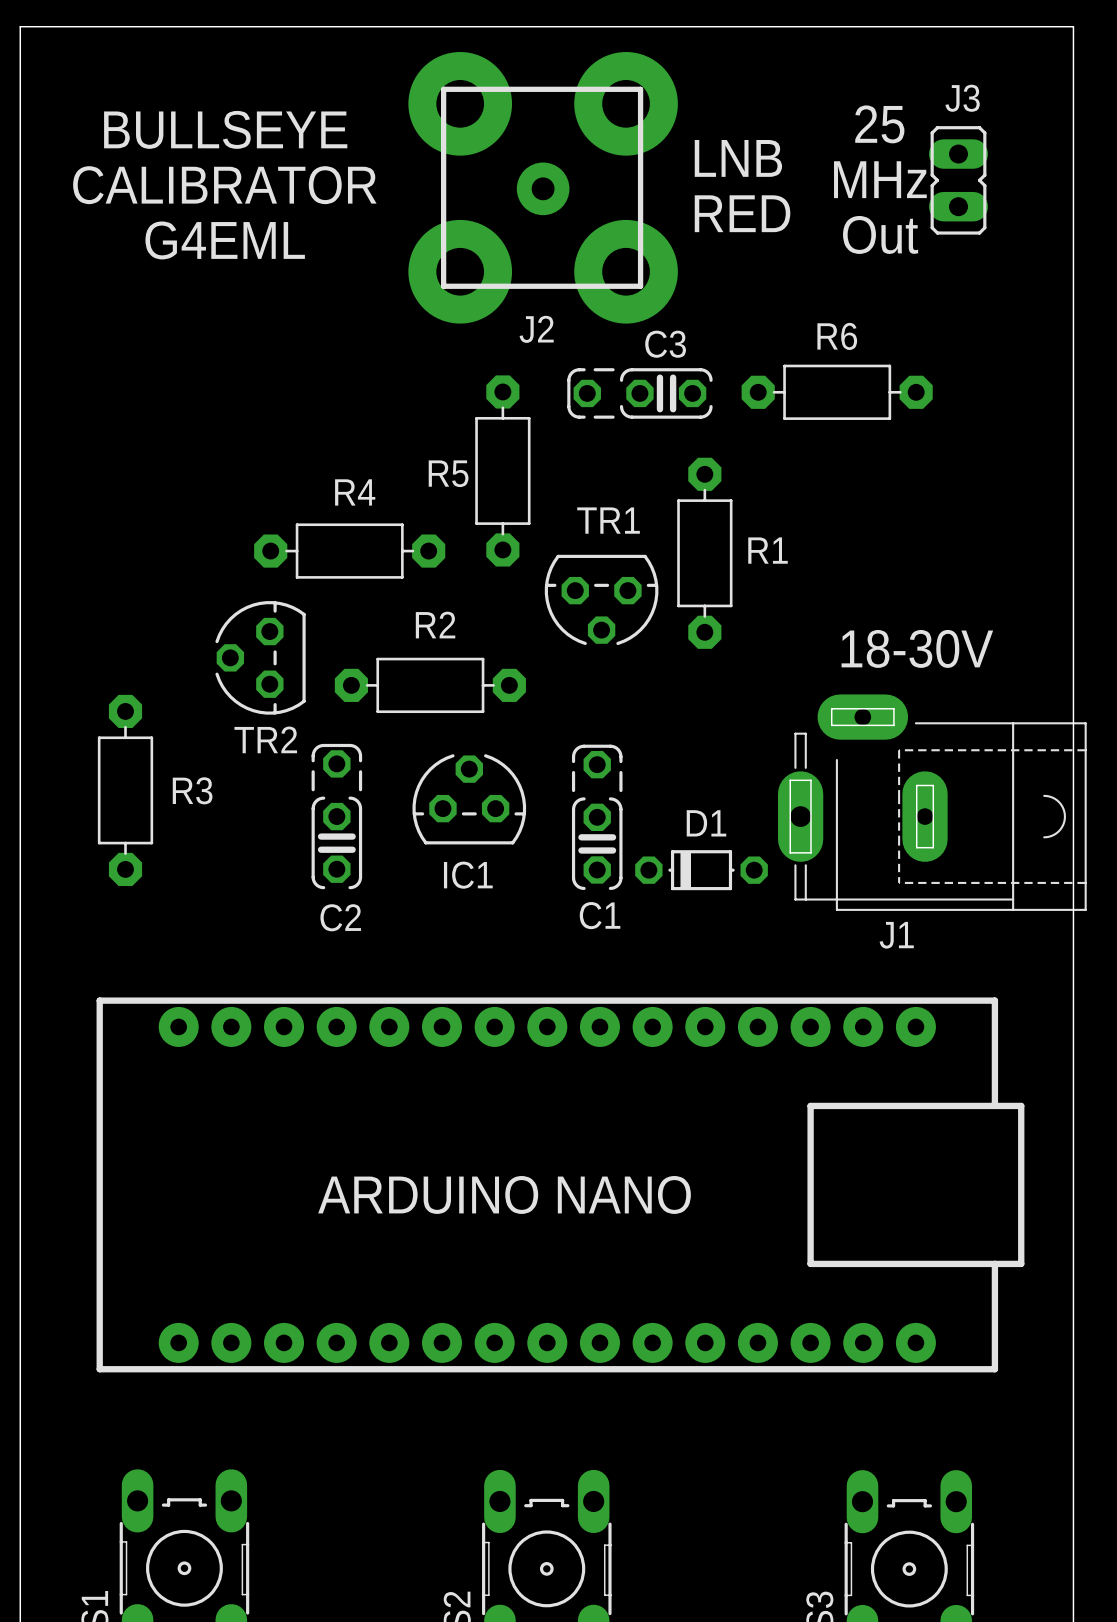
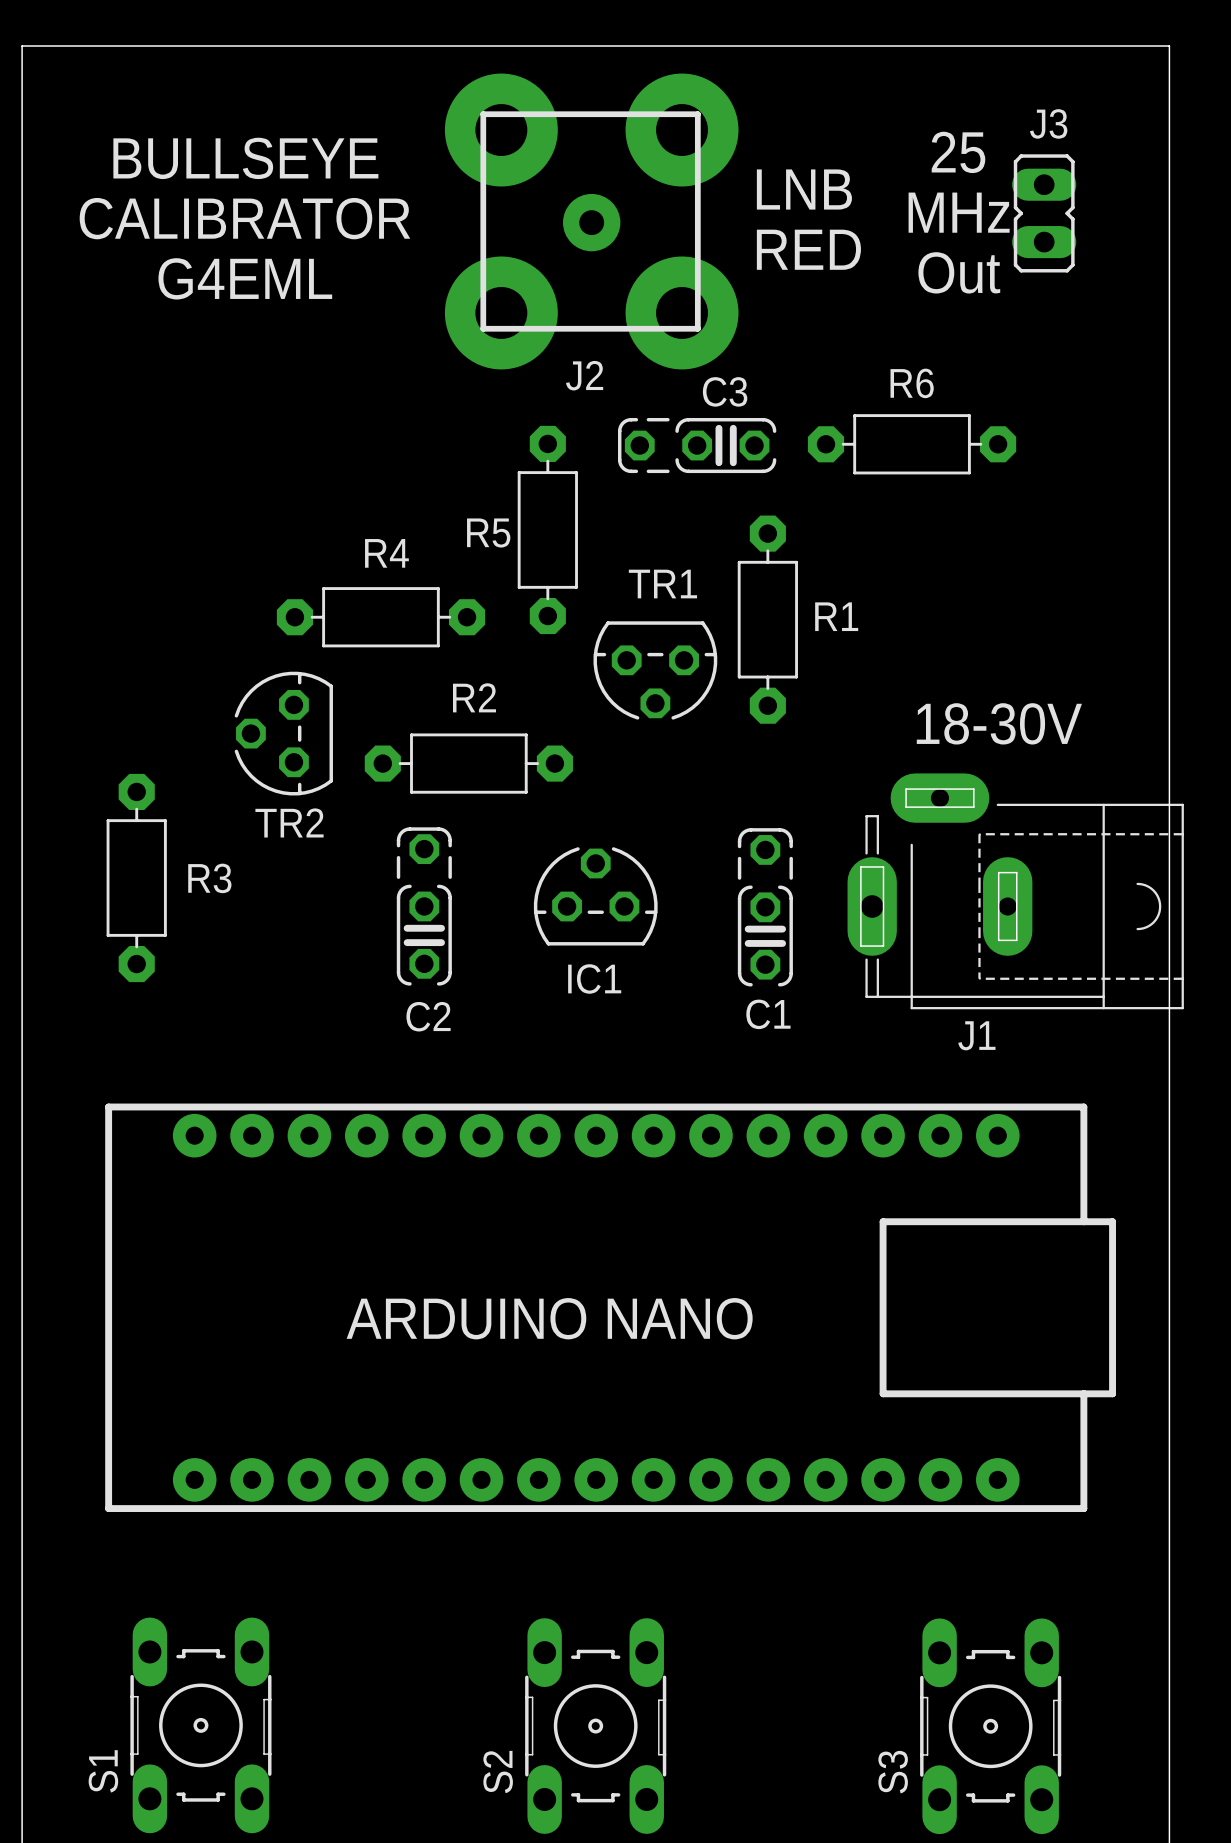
IC1 position: (469, 799) -> (595, 896)
C2 position: (336, 816) -> (424, 906)
C1 position: (597, 817) -> (765, 907)
D1: (701, 870) -> none

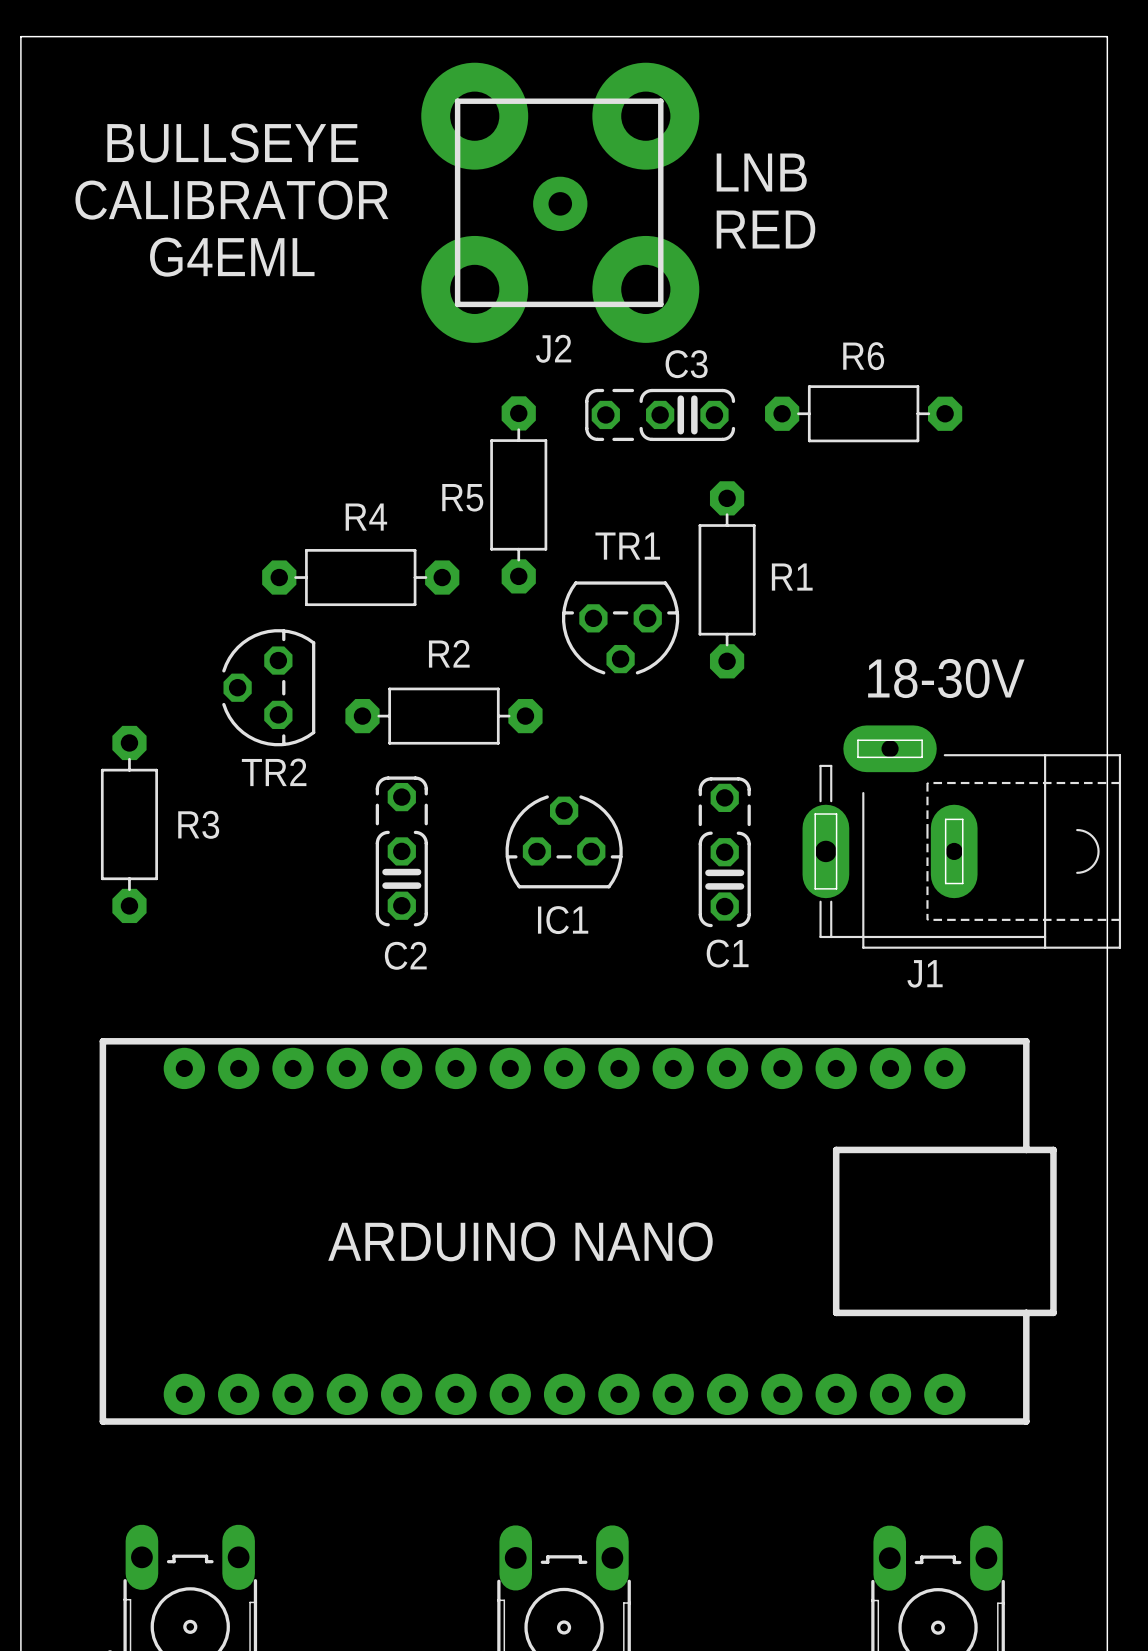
text: 25 (958, 152) -> none
text: MHz (959, 212) -> none
J3: (1044, 213) -> none
text: Out (959, 272) -> none

